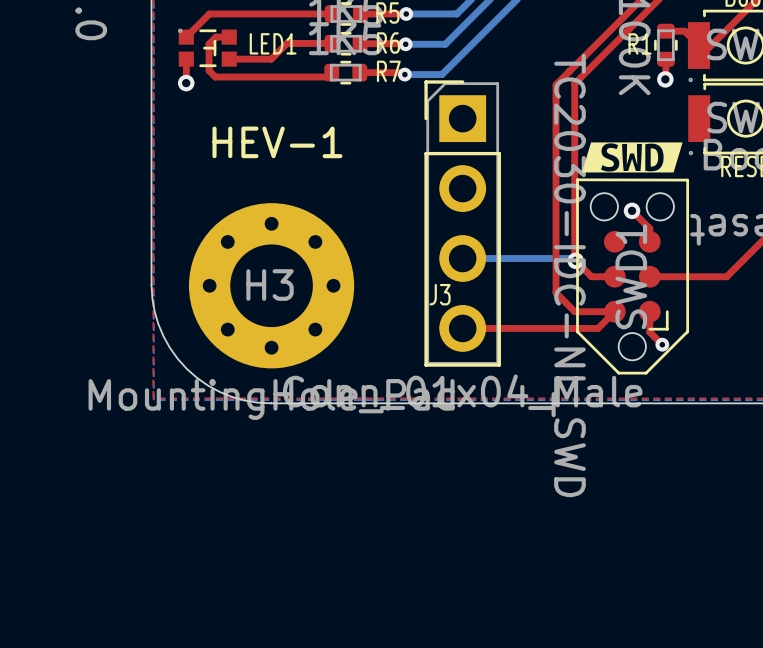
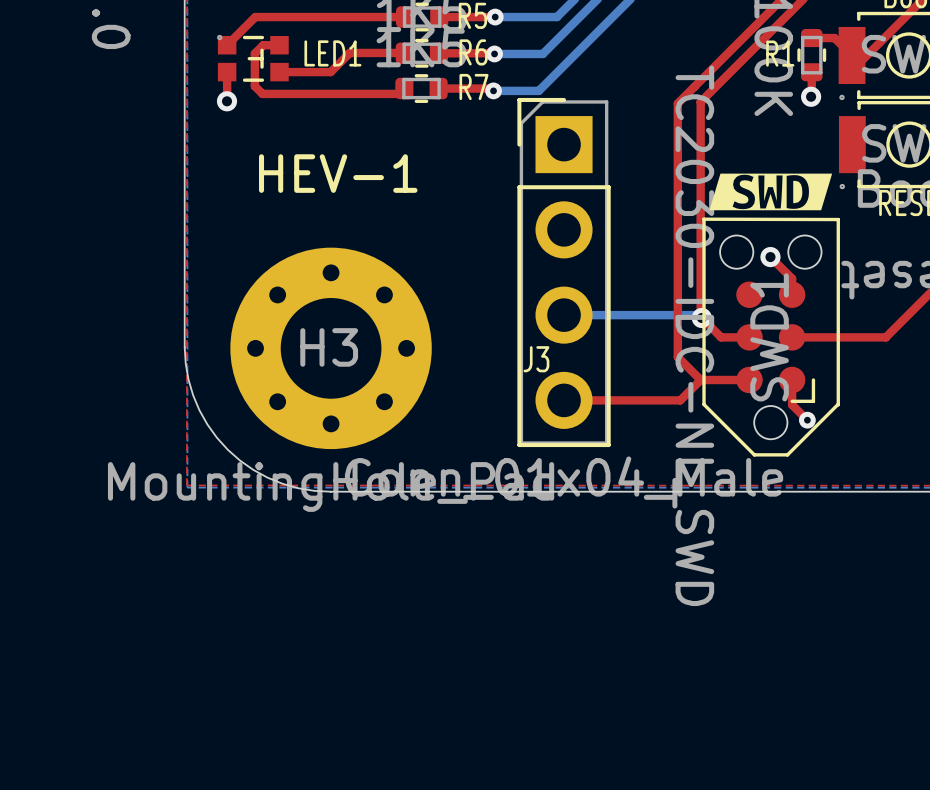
top track: (614, 311) (598, 328) (558, 328) -> (700, 380) (680, 400)

